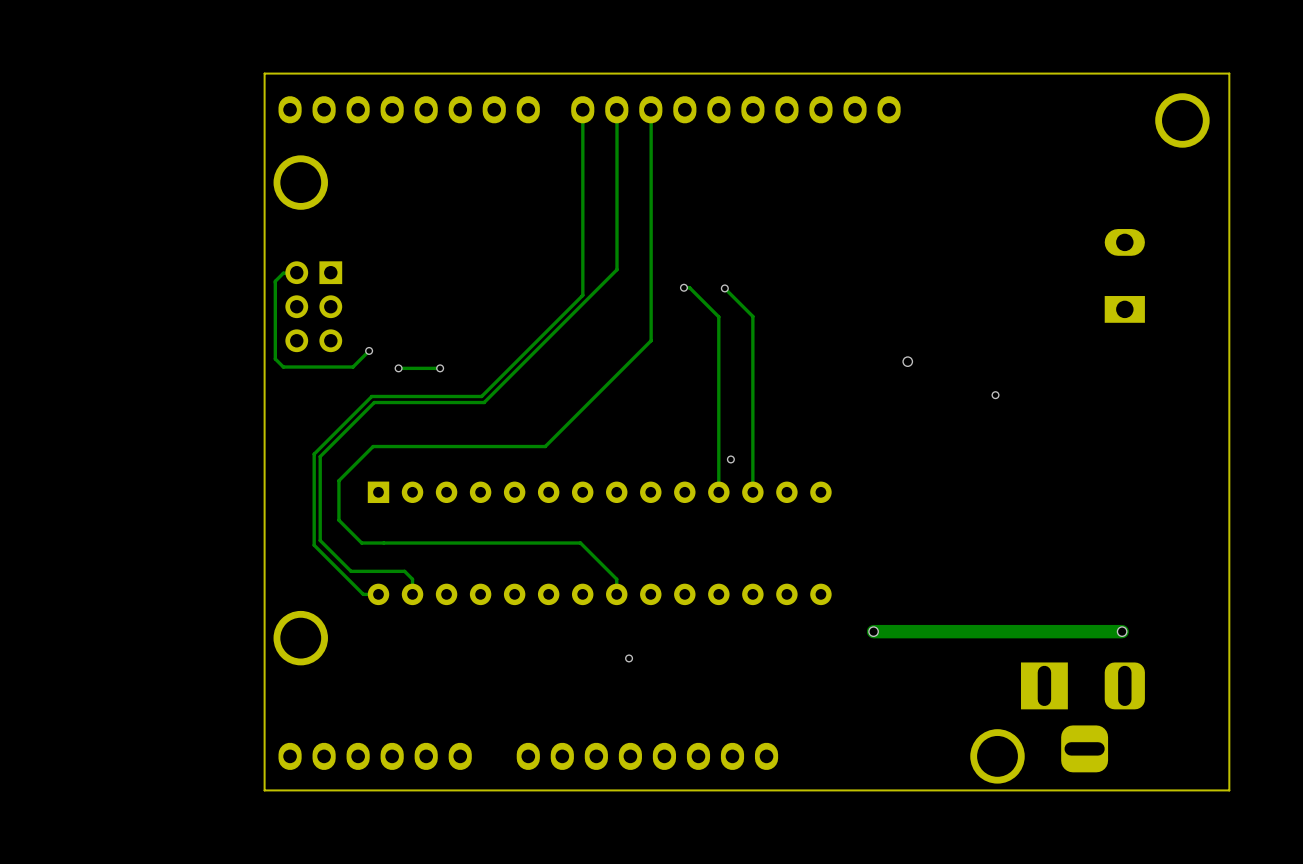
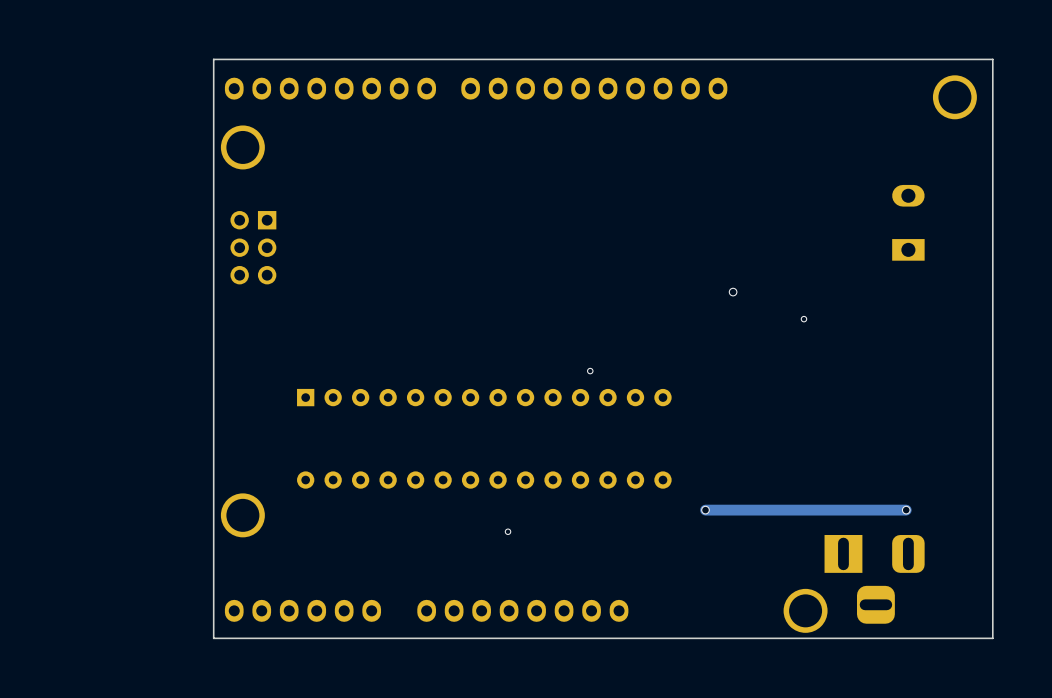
track: (582, 109) (582, 295) (481, 396) (371, 396) (314, 454) (314, 545) (363, 594) (378, 594) -> none
track: (617, 109) (617, 269) (484, 402) (374, 402) (320, 456) (320, 540) (351, 571) (404, 571) (412, 579) (412, 594) -> none
track: (651, 110) (651, 340) (545, 446) (373, 446) (338, 480) (338, 520) (361, 543) (580, 543) (616, 579) (616, 594) -> none
track: (294, 273) (283, 273) (275, 281) (275, 358) (283, 367) (353, 367) (369, 350) -> none
track: (683, 287) (689, 287) (718, 316) (718, 492) -> none
via: (683, 287) -> none
track: (724, 288) (752, 316) (752, 492) -> none
via: (724, 288) -> none
via: (369, 350) -> none
via: (398, 368) -> none
track: (440, 368) (398, 368) -> none
via: (440, 368) -> none

